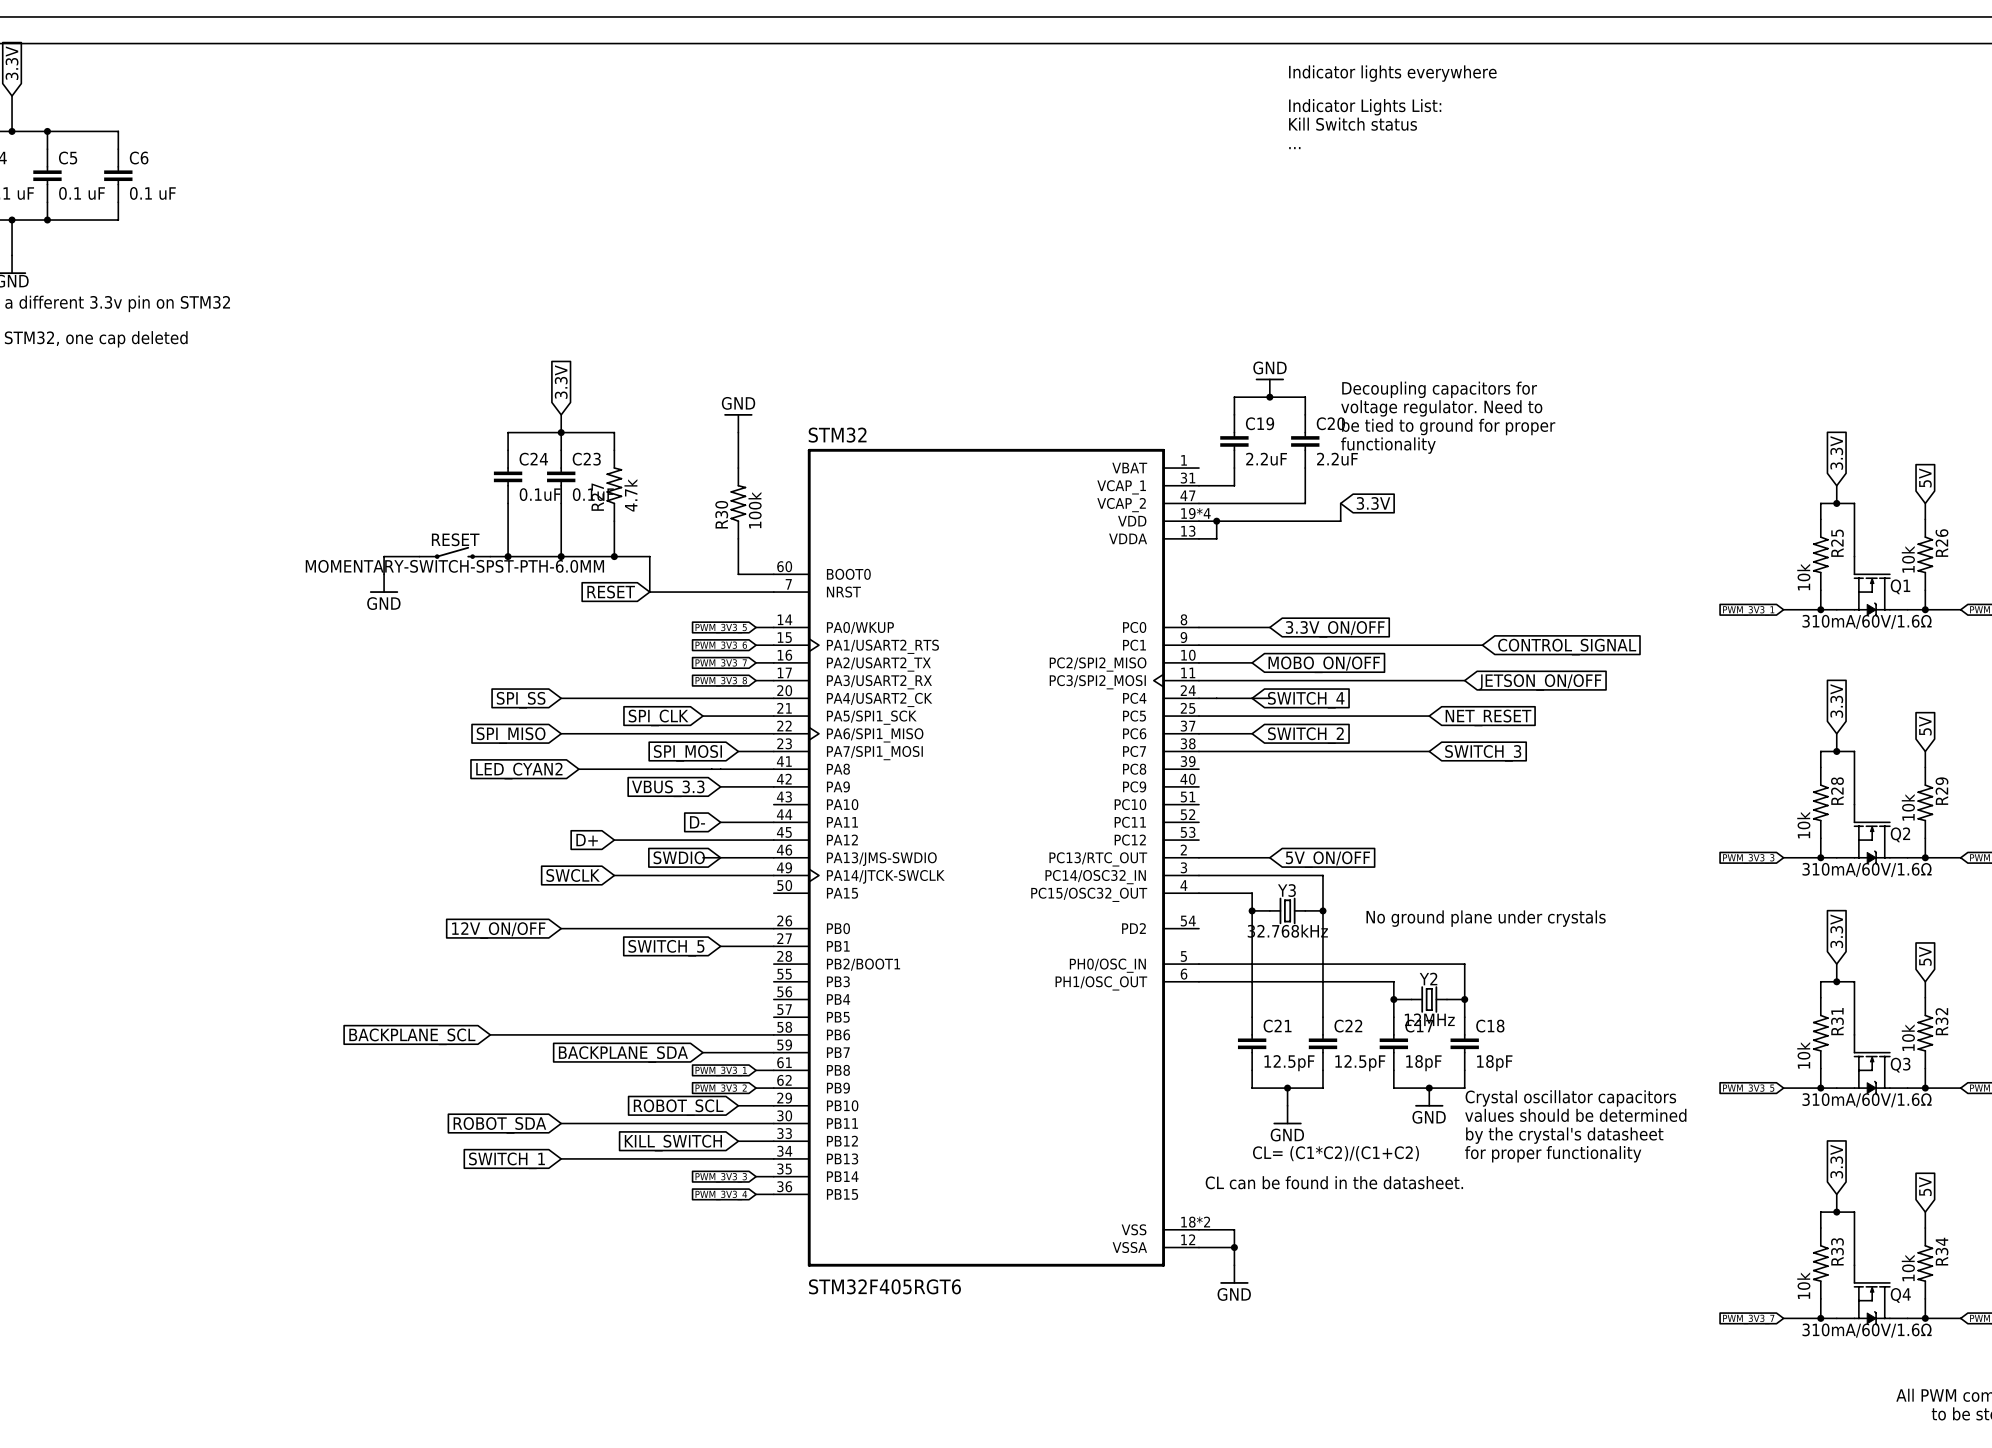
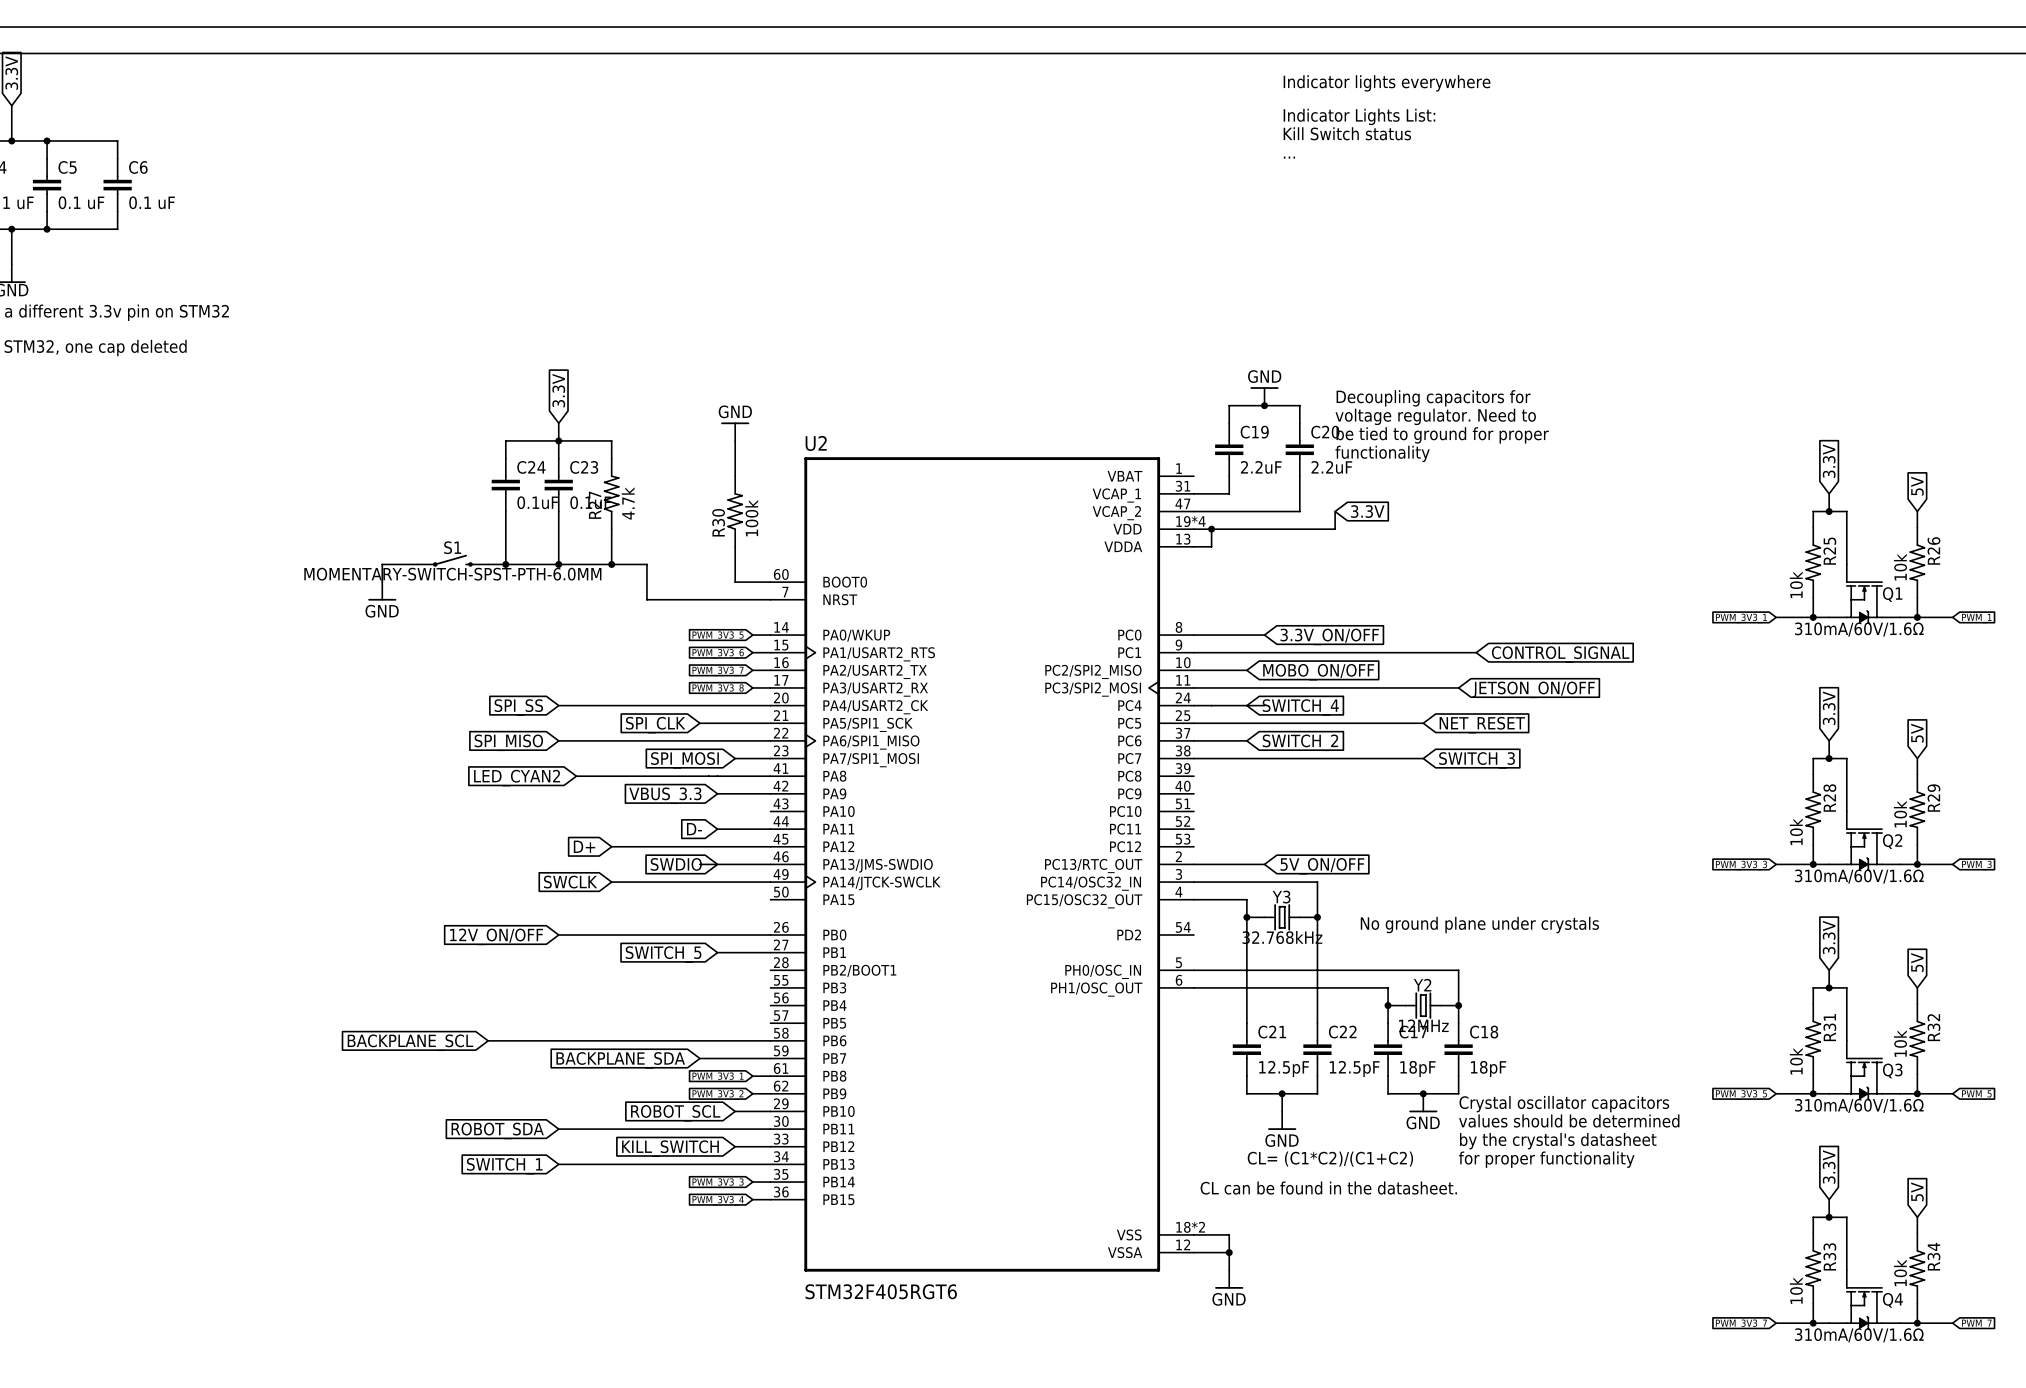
STM32 name: STM32 (837, 435) -> U2 (816, 443)
RESET name: RESET (455, 539) -> S1 (452, 547)
global label: RESET (611, 592) -> none

